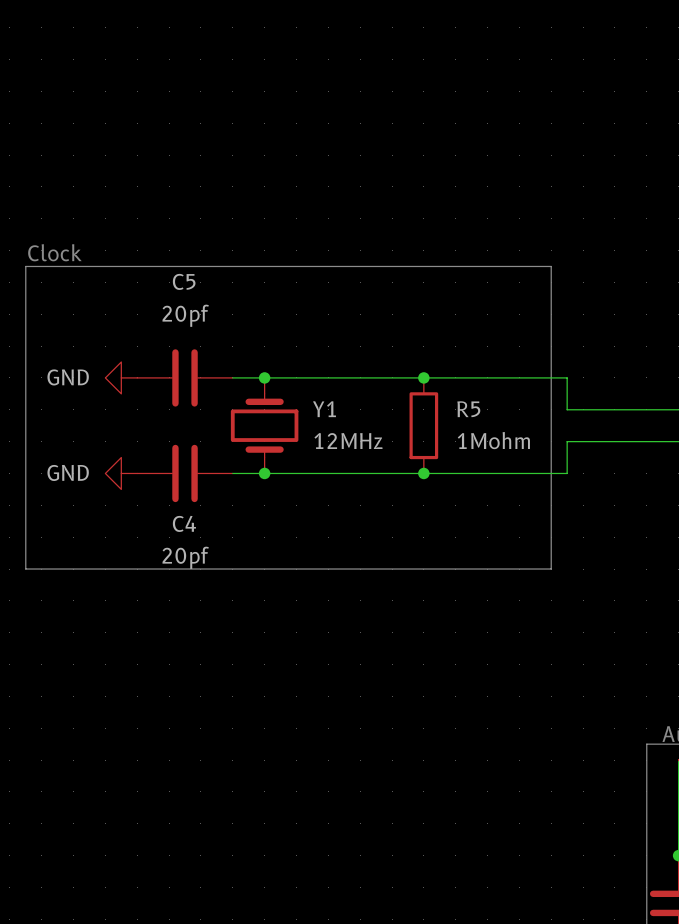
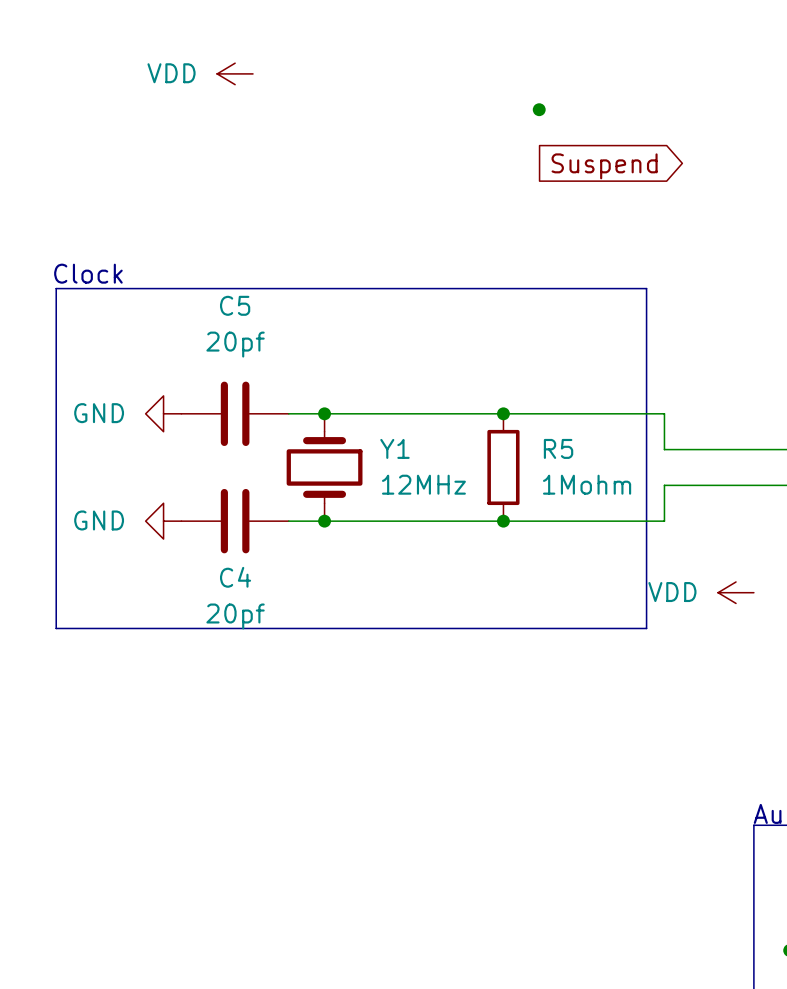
power symbol: none -> VDD (235, 73)
junction: none -> (539, 109)
global label: none -> Suspend (604, 166)
power symbol: none -> VDD (736, 592)

